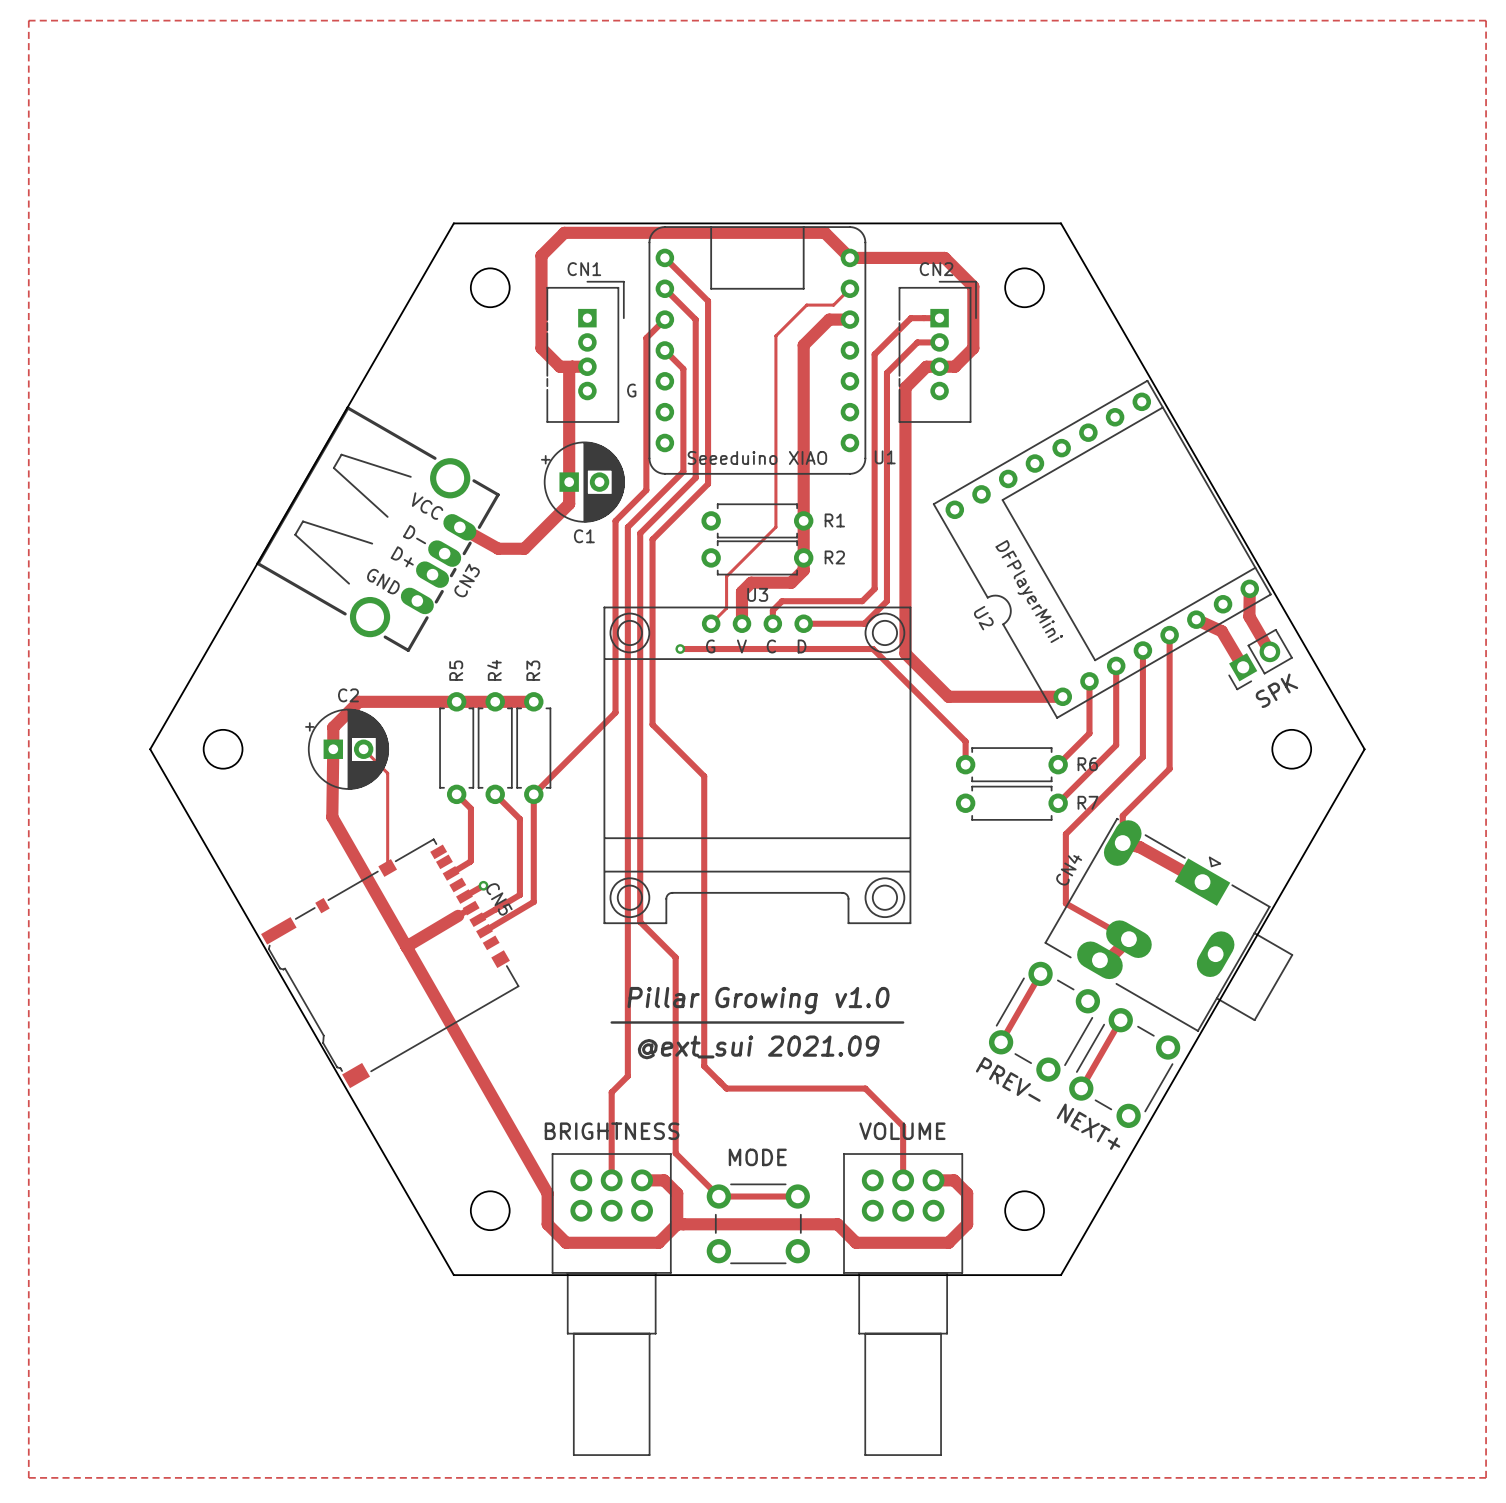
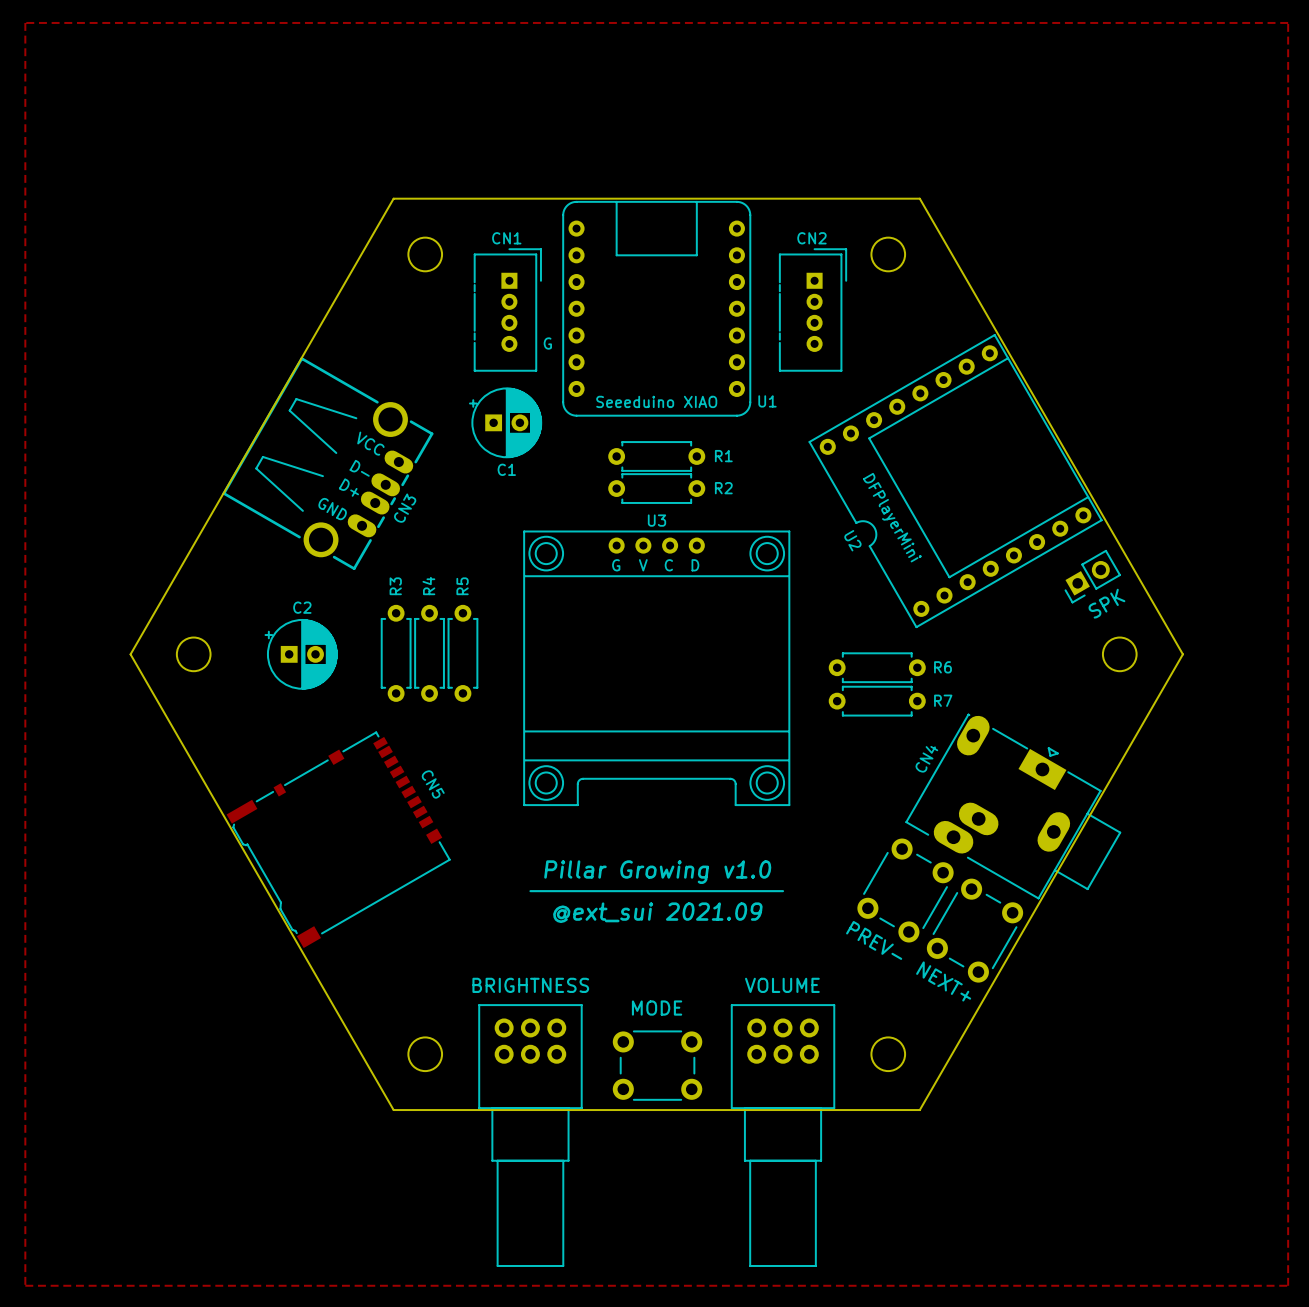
track: (664, 257) (708, 301) (708, 483) (652, 539) (652, 724) (704, 776) (704, 1066) (726, 1088) (865, 1088) (903, 1126) (903, 1180) -> none
track: (664, 288) (695, 319) (695, 477) (640, 533) (640, 922) (675, 957) (675, 1153) (718, 1196) (797, 1196) -> none
track: (849, 288) (833, 305) (806, 305) (775, 335) (775, 527) (726, 576) (726, 608) (711, 623) -> none
track: (939, 318) (910, 318) (874, 354) (874, 588) (862, 601) (782, 601) (772, 610) (772, 623) -> none
track: (664, 319) (646, 338) (646, 490) (615, 521) (615, 712) (533, 794) (533, 901) (484, 931) -> none
track: (849, 319) (829, 319) (803, 345) (803, 570) (791, 582) (751, 582) (741, 591) (741, 623) -> none
track: (939, 342) (917, 342) (886, 372) (886, 601) (864, 623) (803, 623) -> none
track: (664, 350) (683, 368) (683, 471) (627, 527) (627, 1076) (611, 1092) (611, 1180) -> none
track: (572, 366) (569, 369) (569, 503) (524, 548) (498, 548) (459, 527) -> none
track: (587, 366) (559, 366) (541, 348) (541, 255) (564, 232) (824, 232) (849, 257) (944, 257) (973, 286) (973, 348) (954, 366) (926, 366) (905, 387) (905, 653) (948, 696) (1062, 696) -> none
track: (1249, 588) (1249, 616) (1269, 651) -> none
track: (1196, 619) (1221, 631) (1243, 667) -> none
track: (1169, 635) (1169, 768) (1122, 815) (1122, 843) (1139, 847) (1202, 882) -> none
track: (680, 649) (873, 649) (965, 741) (965, 764) -> none
via: (680, 649) -> none
track: (1142, 650) (1142, 757) (1065, 834) (1065, 903) (1128, 939) (1107, 960) (1099, 960) -> none
track: (1116, 665) (1116, 745) (1058, 803) -> none
R5 name: R5 (456, 670) -> R3 (395, 586)
R3 name: R3 (533, 670) -> R5 (462, 586)
track: (1089, 681) (1089, 733) (1058, 764) -> none
track: (533, 701) (358, 701) (333, 727) (332, 817) (547, 1193) (547, 1224) (566, 1242) (658, 1242) (677, 1224) -> none
track: (363, 749) (387, 773) (387, 867) -> none
track: (456, 794) (470, 808) (470, 860) (451, 873) -> none
track: (495, 794) (519, 819) (519, 895) (477, 919) -> none
track: (483, 885) (464, 896) -> none
via: (483, 885) -> none
track: (471, 908) (406, 946) -> none
track: (1040, 973) (1001, 1042) -> none
track: (1120, 1020) (1081, 1088) -> none
track: (642, 1180) (664, 1180) (677, 1193) (677, 1224) -> none
track: (933, 1180) (954, 1180) (967, 1193) (967, 1224) (948, 1242) (856, 1242) (837, 1224) (677, 1224) -> none

